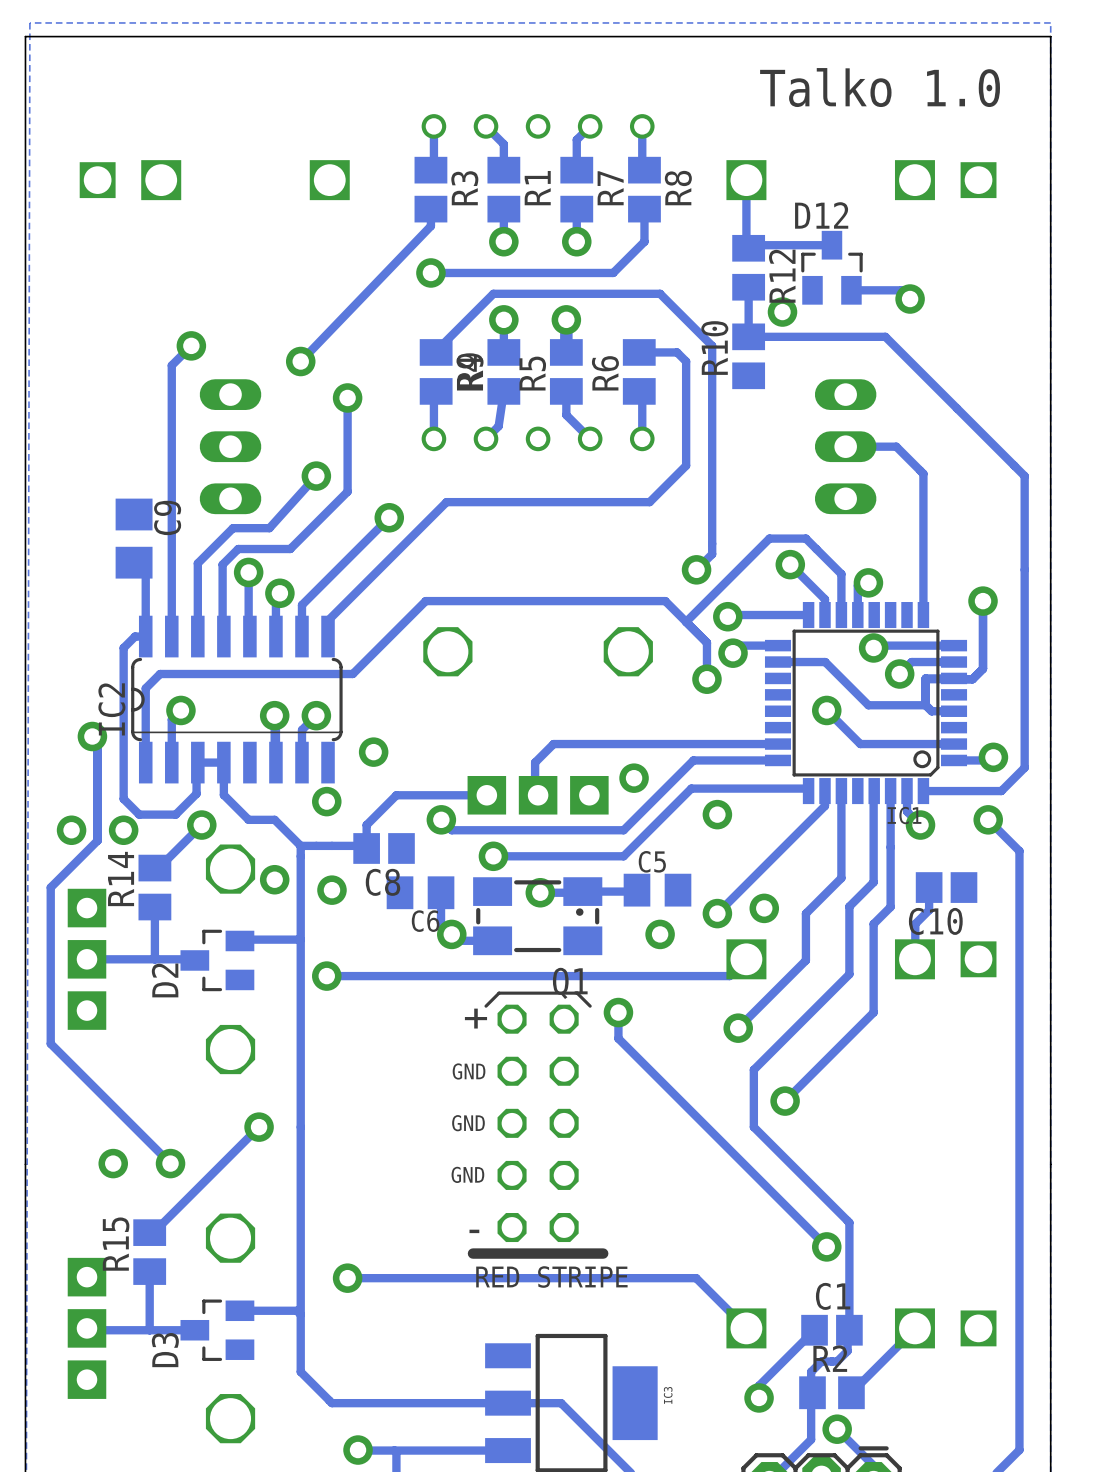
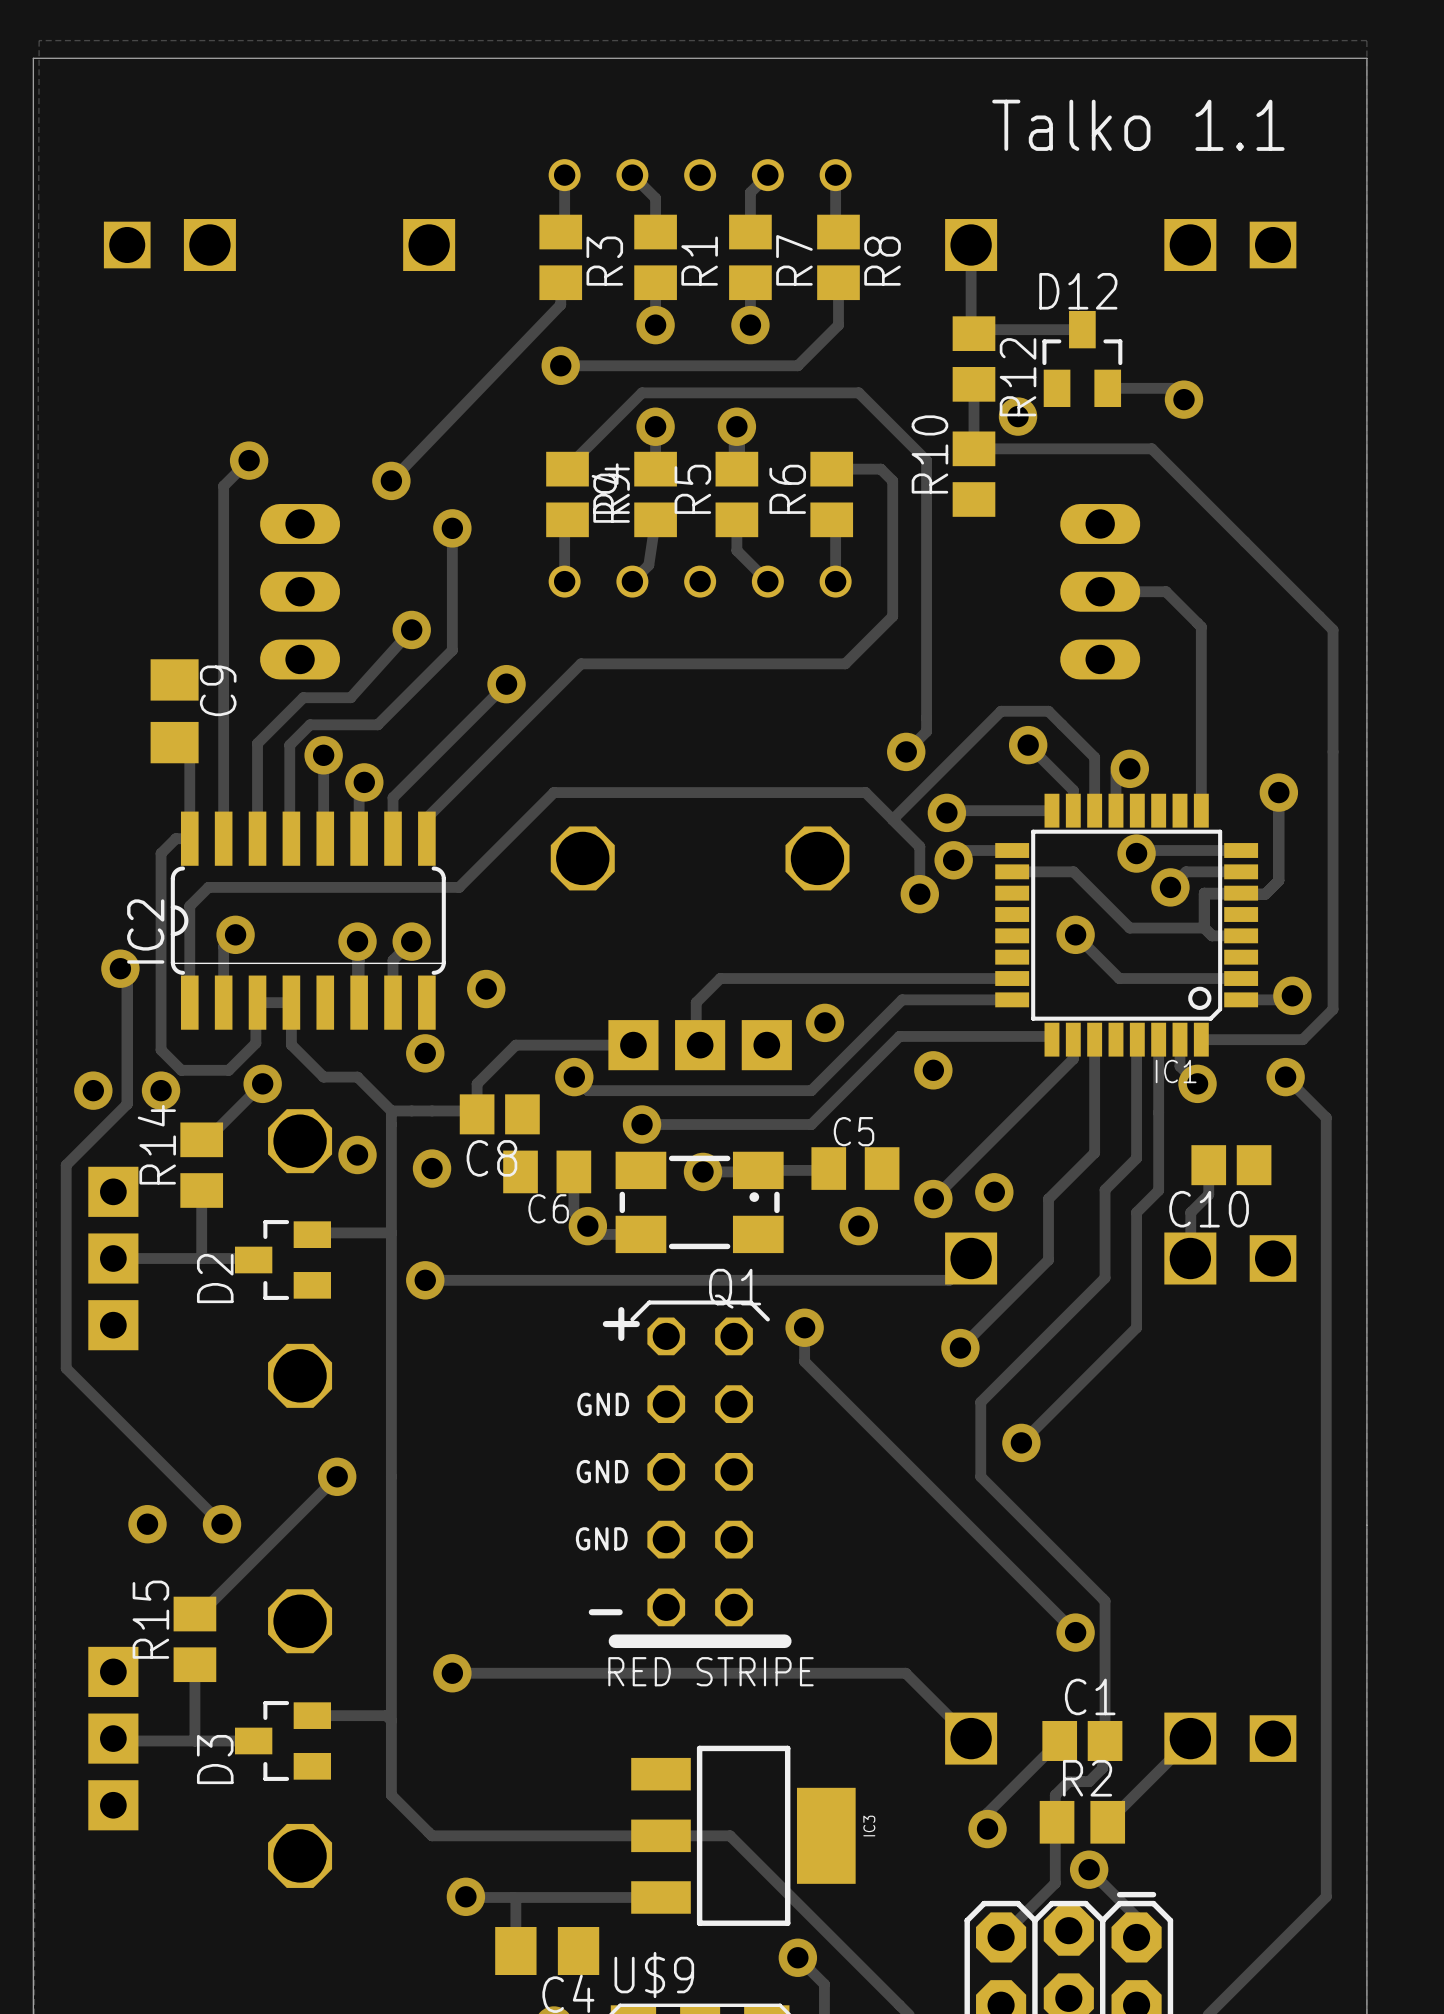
text: Talko 1.0 (880, 87) -> Talko 1.1 (1138, 125)

